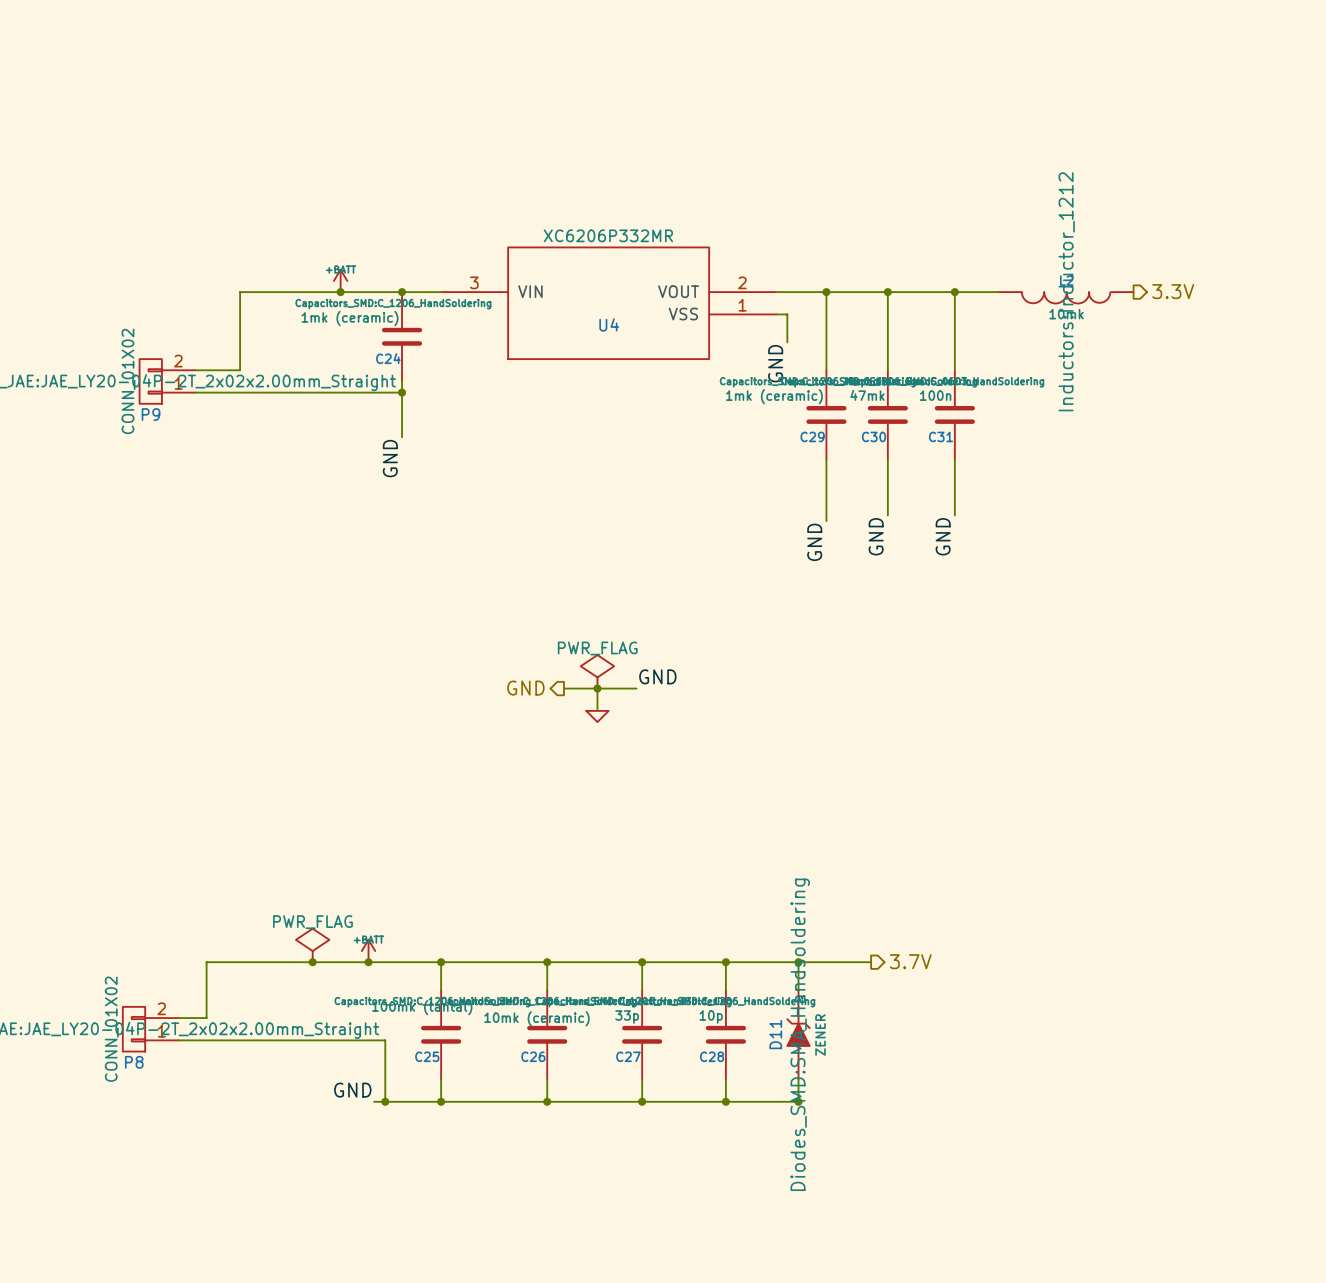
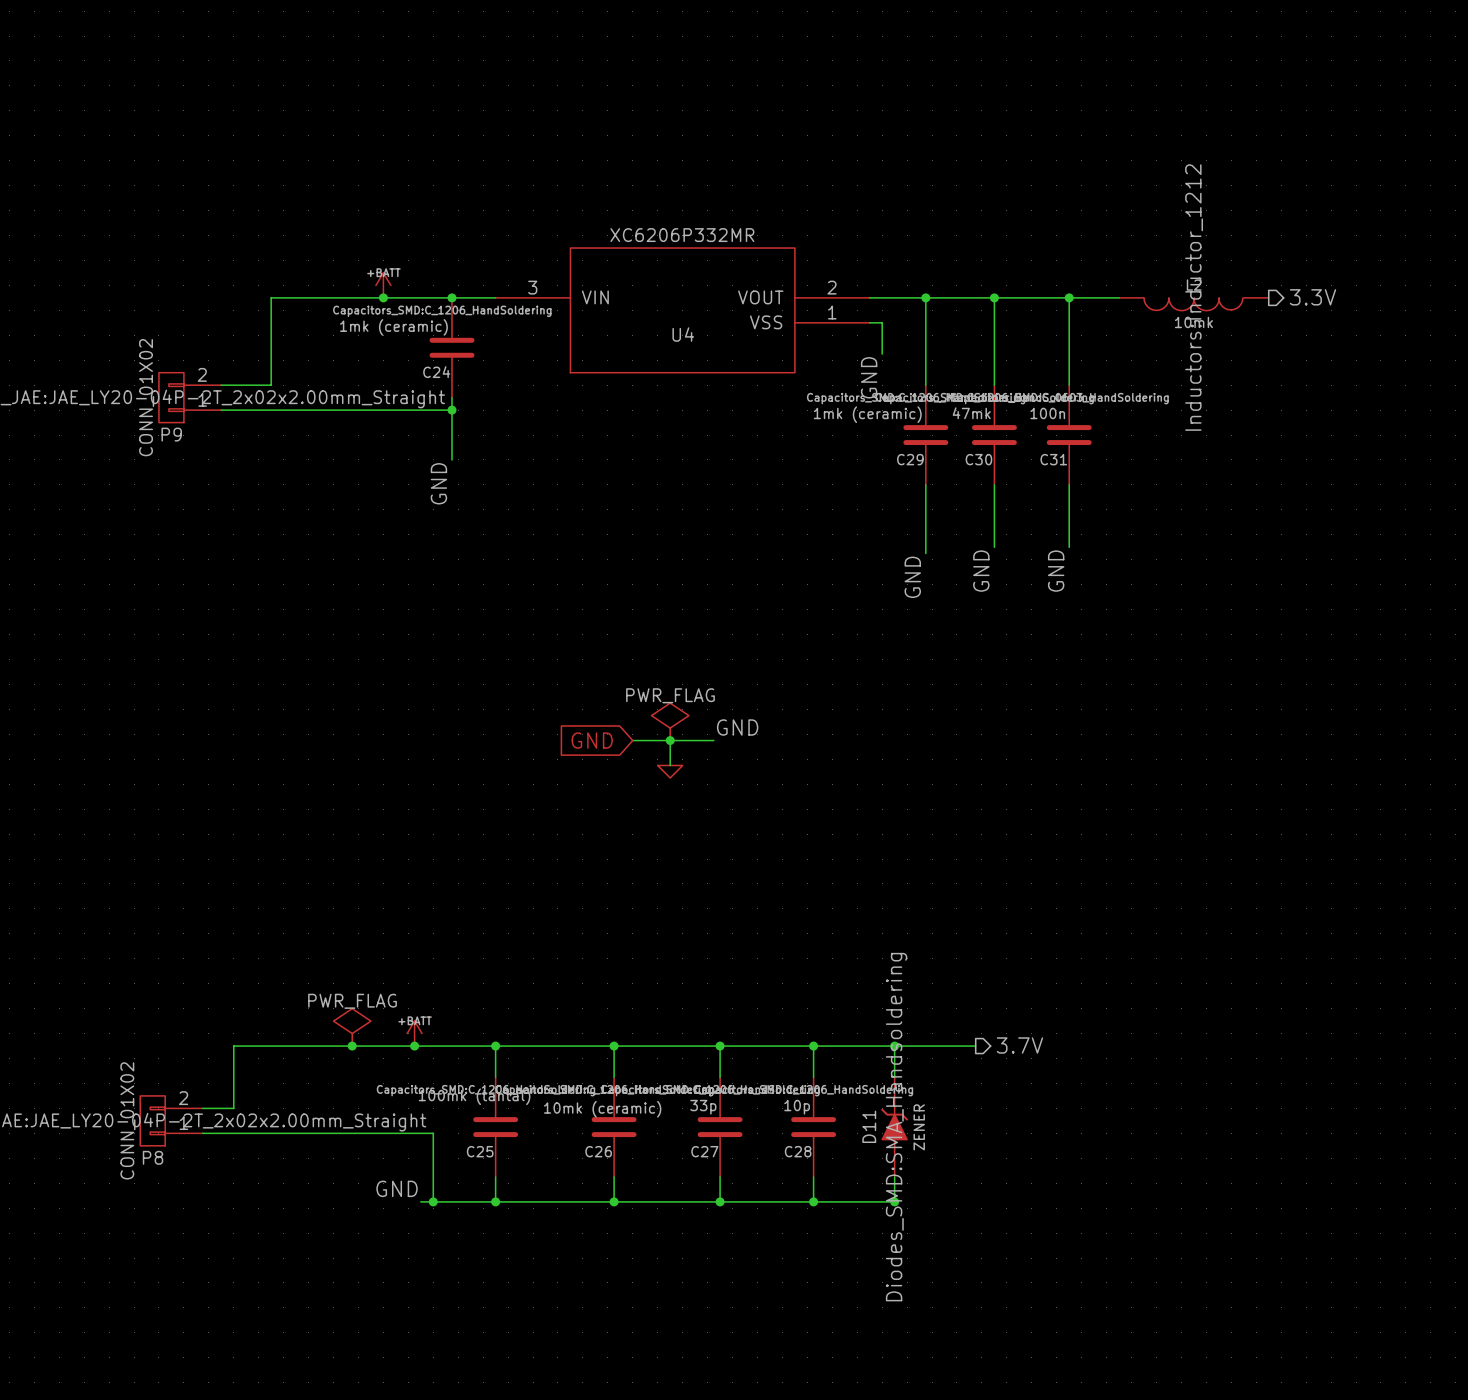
hierarchical label: GND (525, 688) -> none
global label: none -> GND (592, 740)

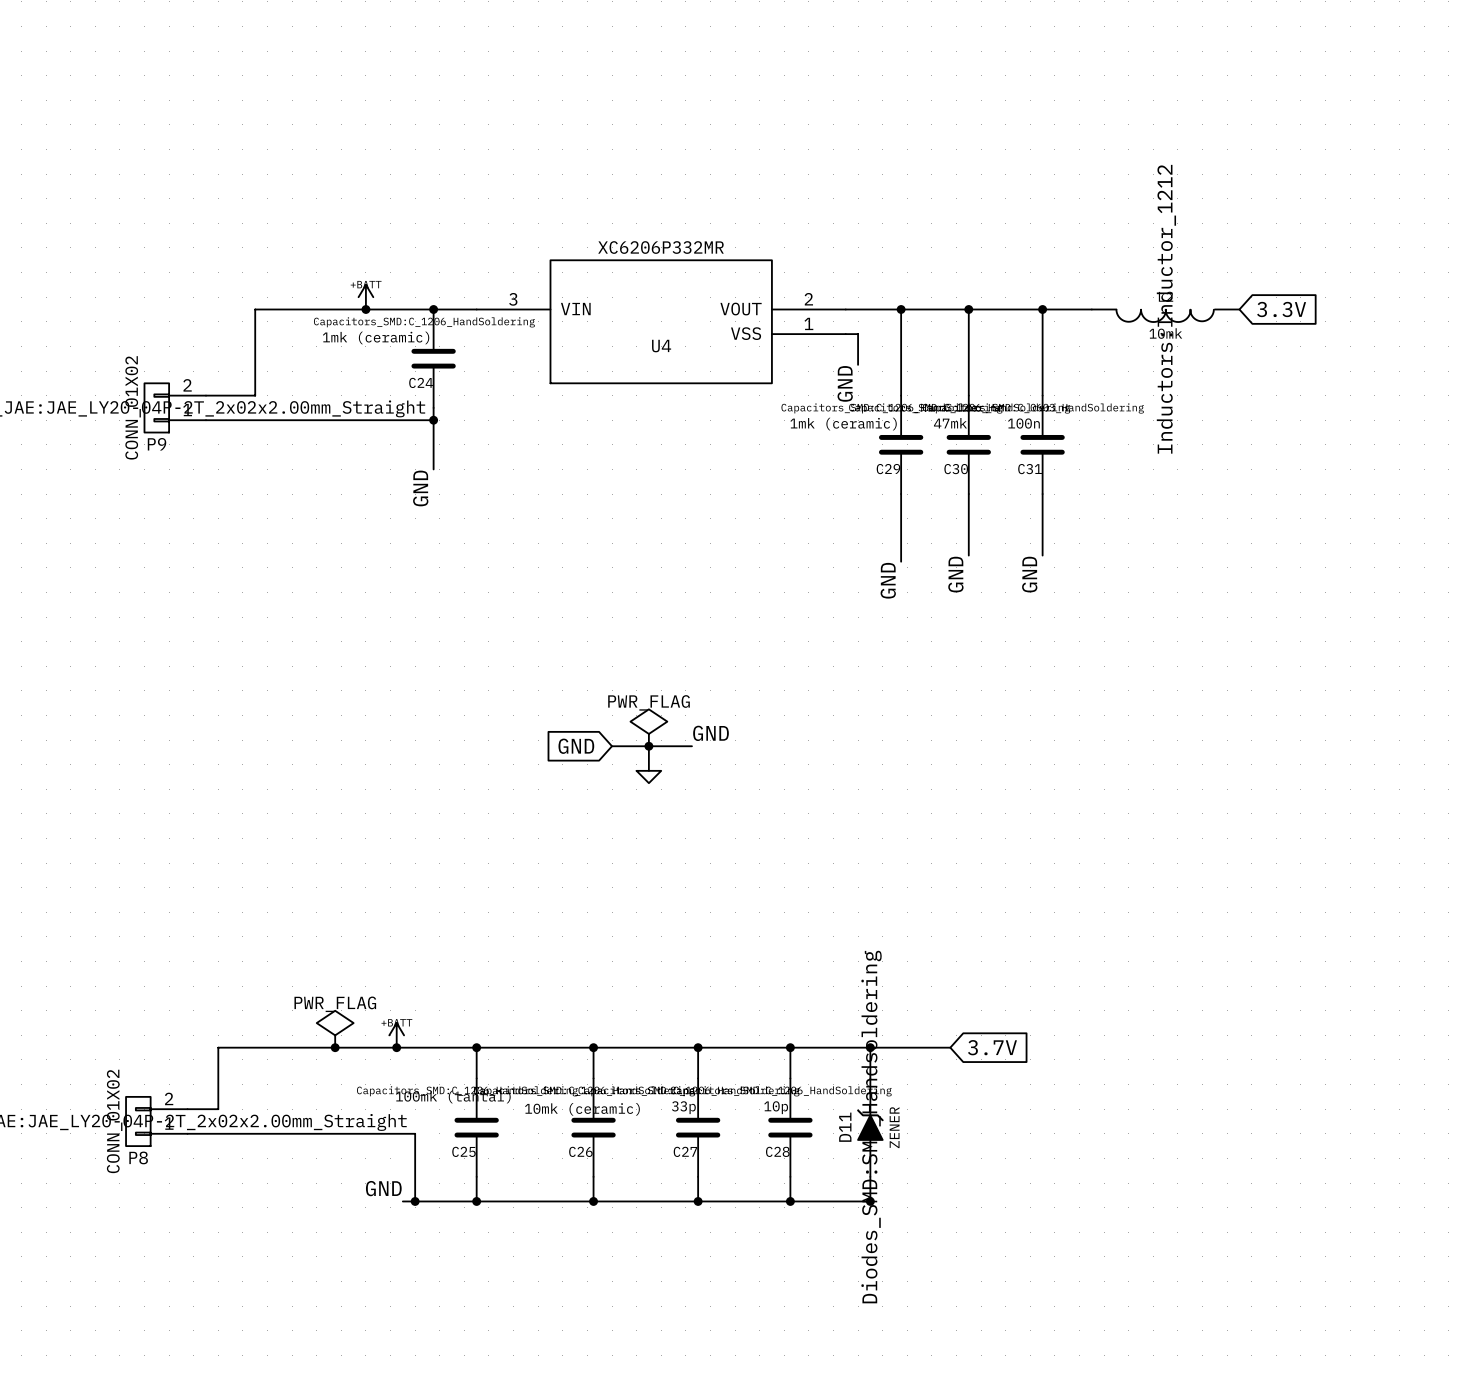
global label: none -> 3.3V (1281, 309)
hierarchical label: 3.3V (1313, 297) -> none
hierarchical label: 3.7V (1019, 1045) -> none
global label: none -> 3.7V (992, 1047)

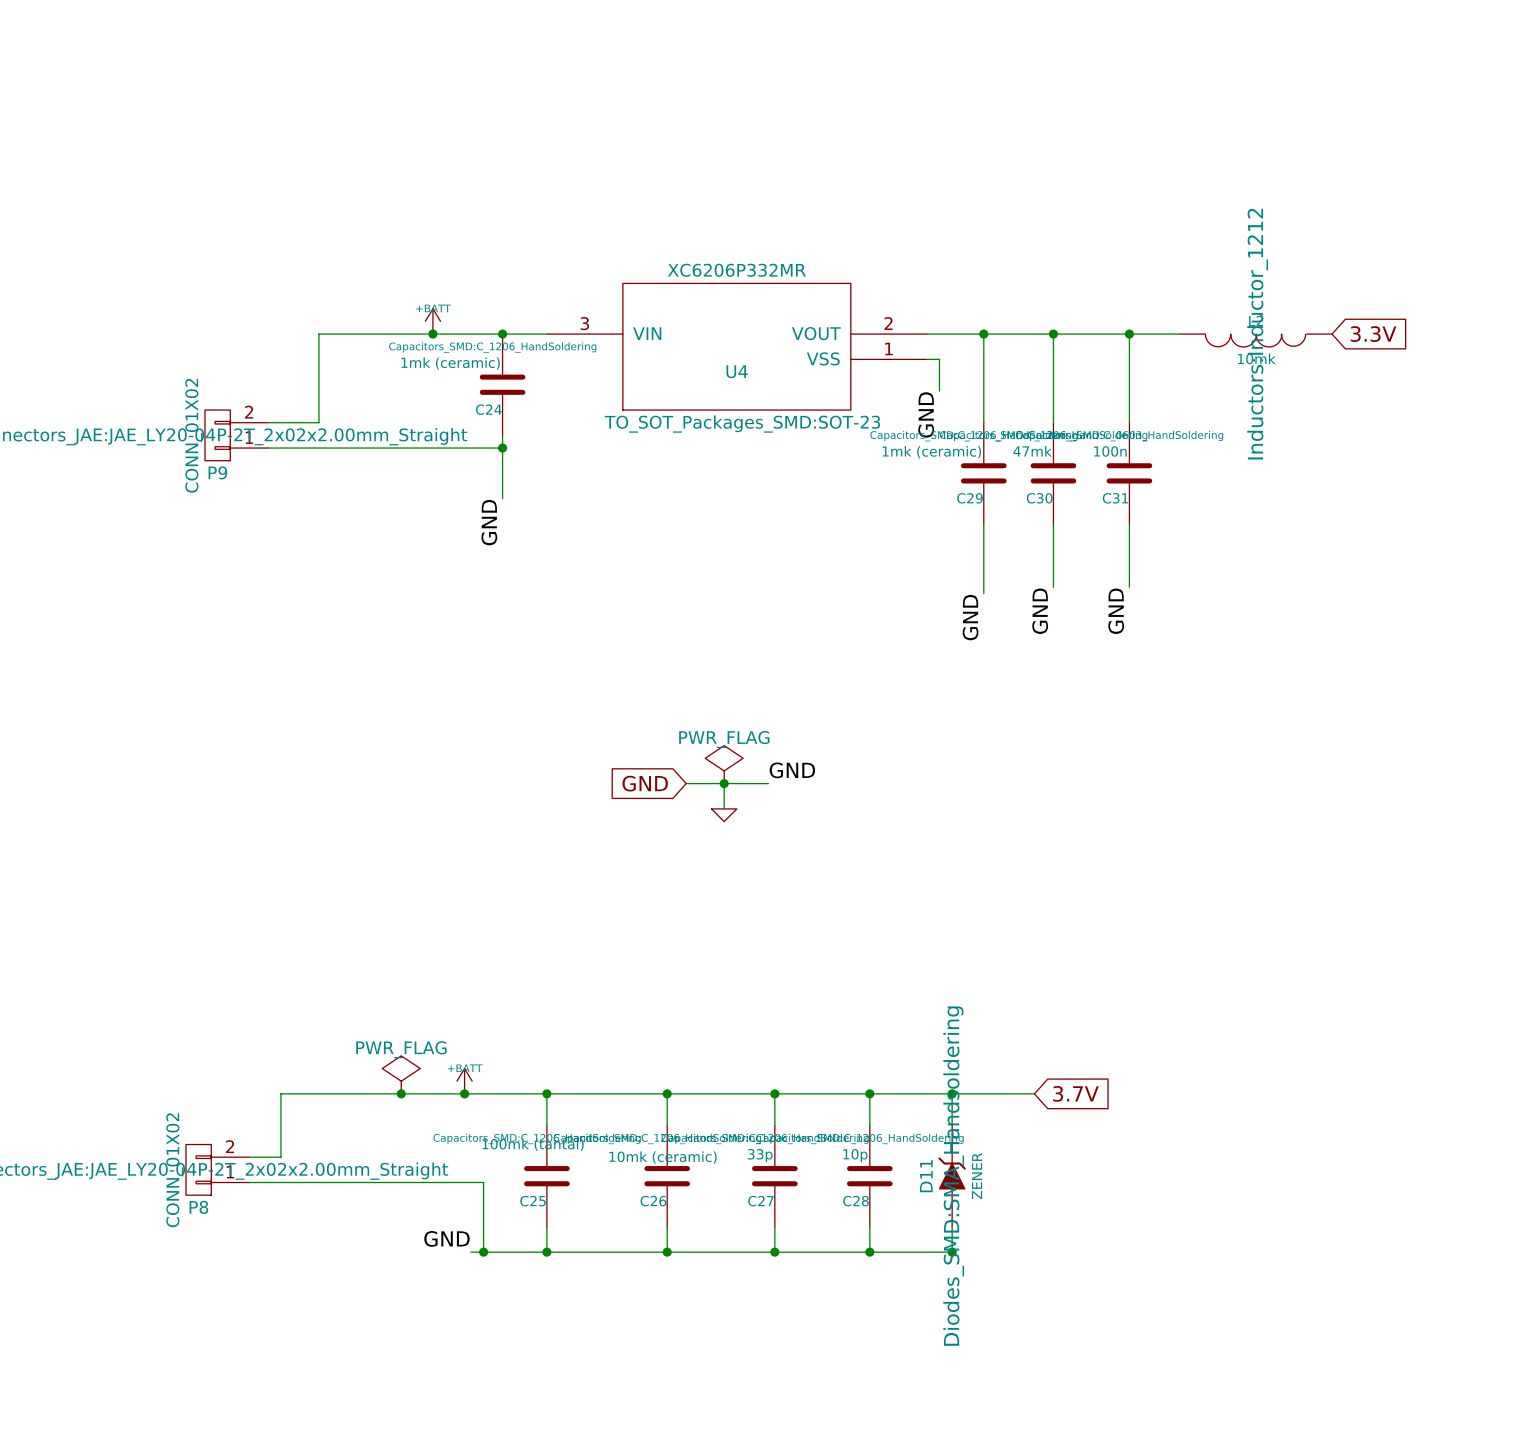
U4 text: none -> TO_SOT_Packages_SMD:SOT-23 (742, 424)

